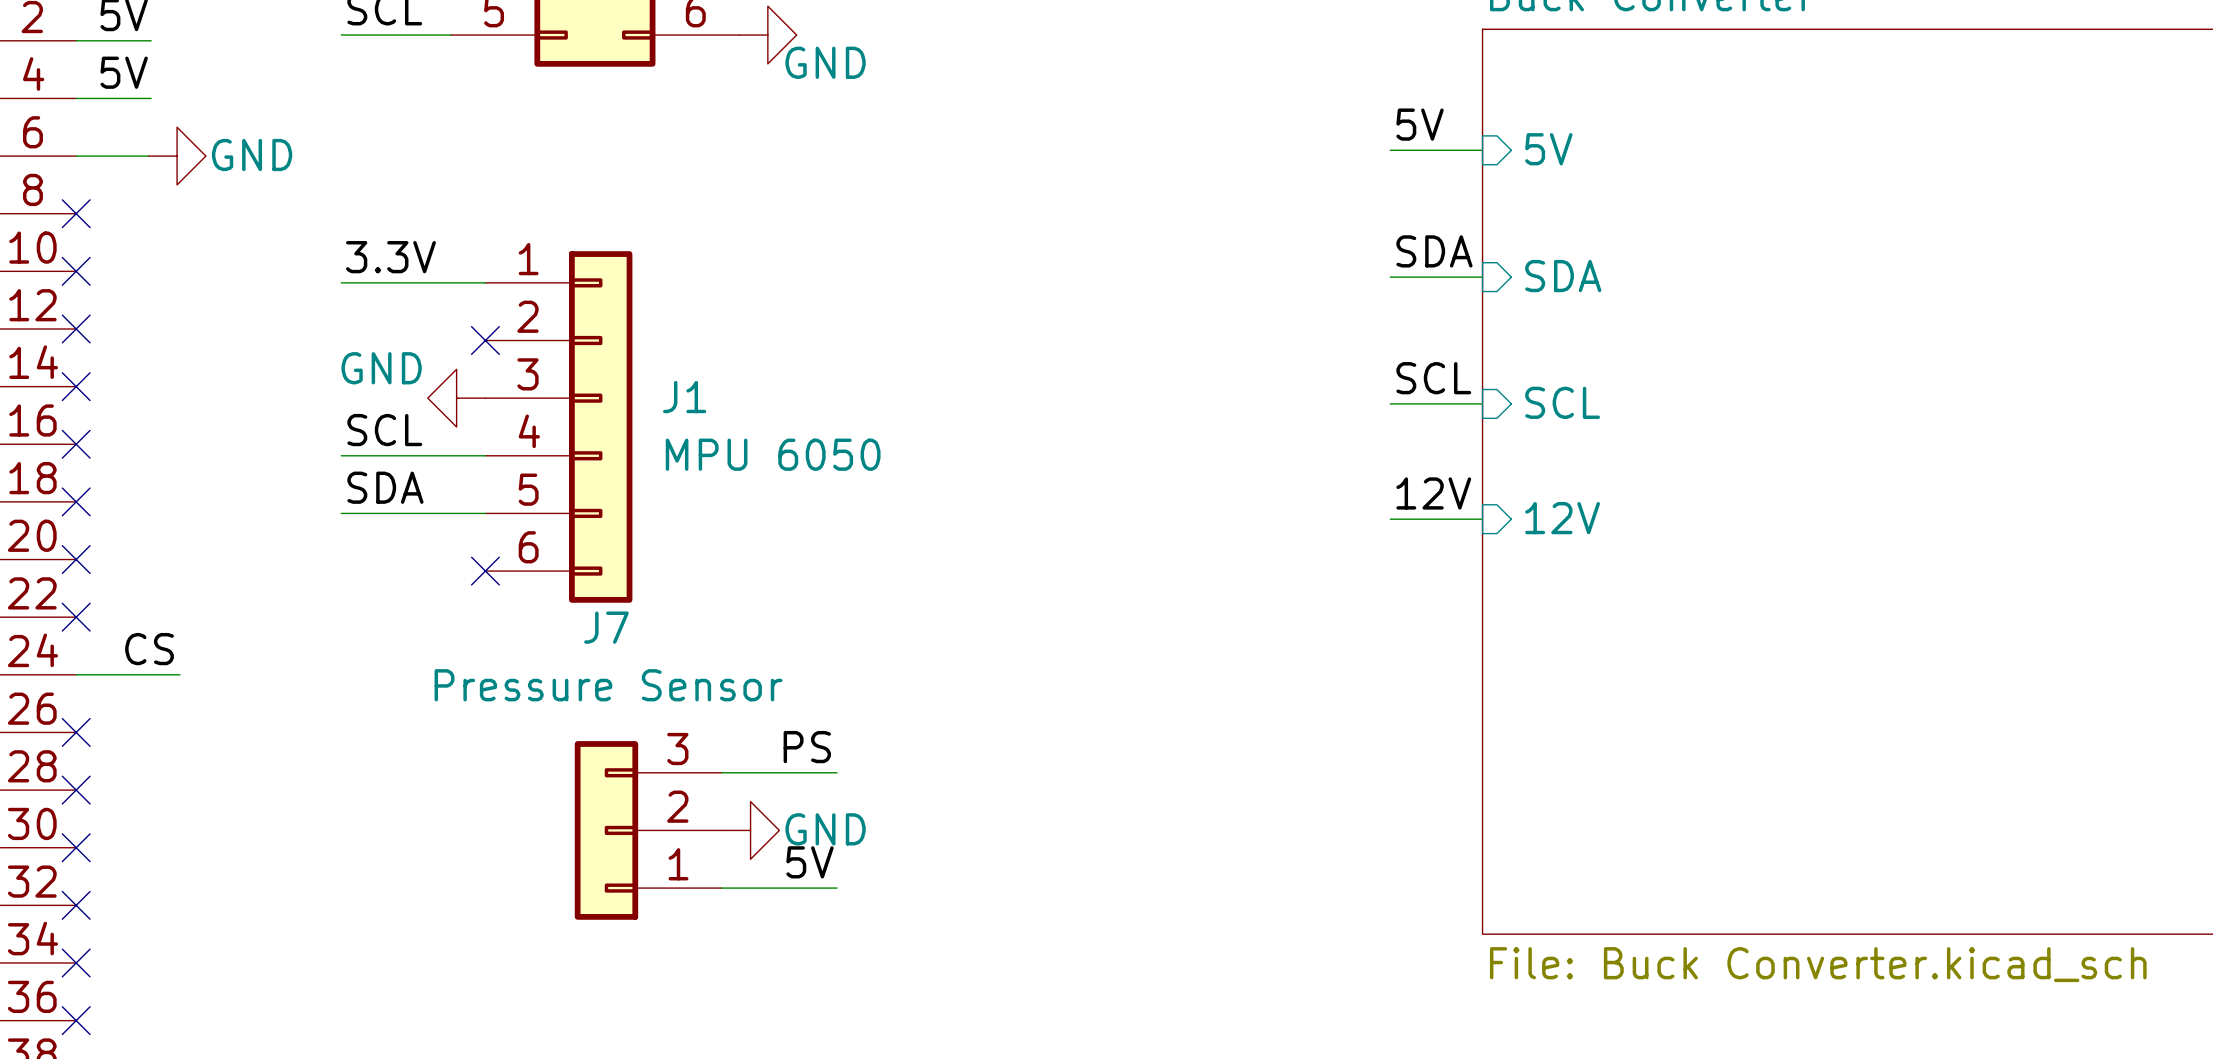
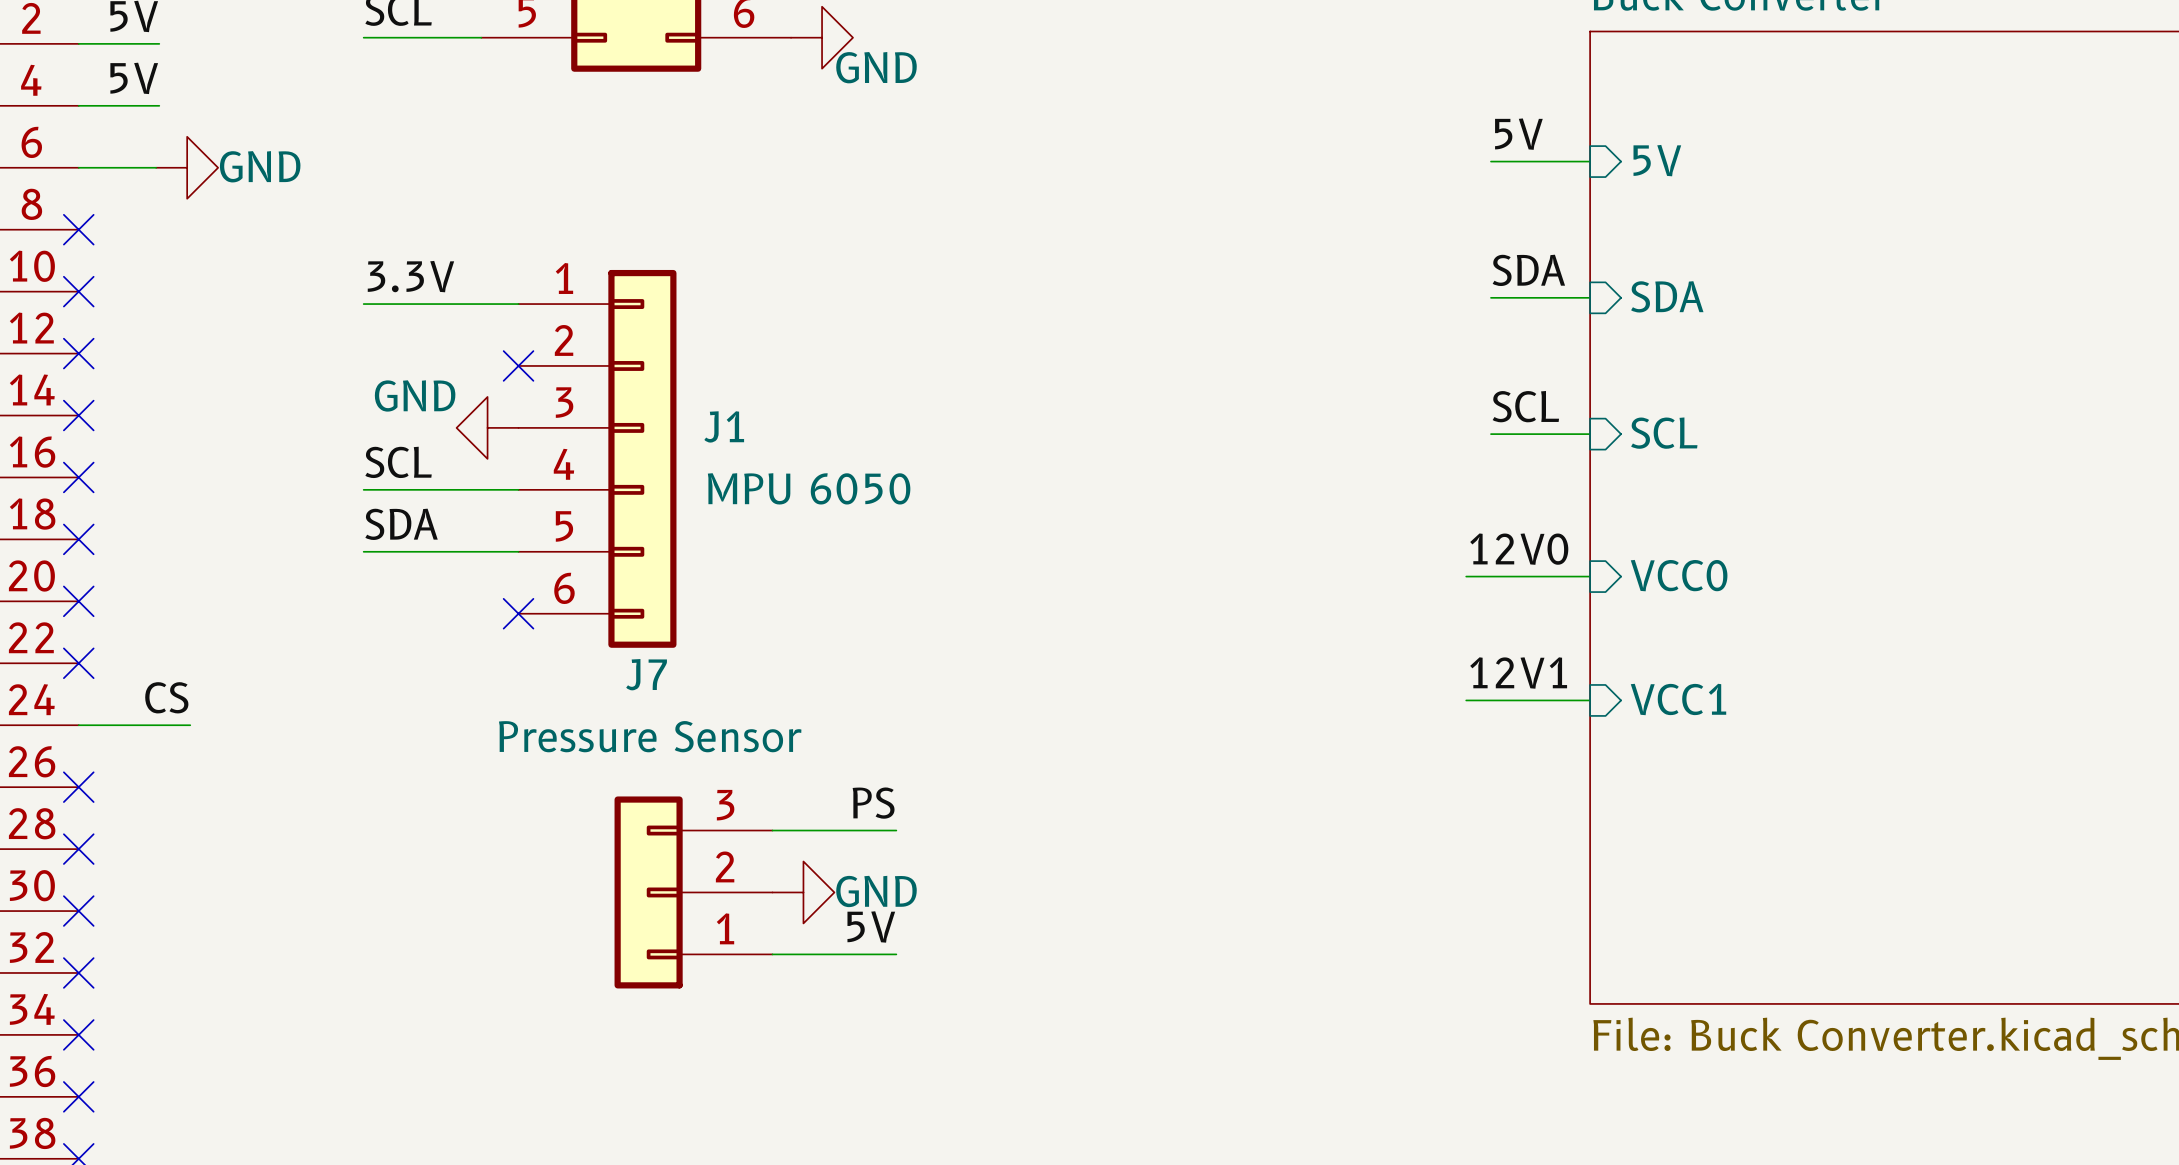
label: 12V (1433, 493) -> 12V0 (1519, 549)
sheet pin: 12V (1562, 518) -> VCC0 (1679, 575)
wire: (1390, 519) (1482, 519) -> none
wire: none -> (1466, 576) (1590, 576)
label: none -> 12V1 (1518, 673)
sheet pin: none -> VCC1 (1678, 699)
wire: none -> (1466, 700) (1590, 700)

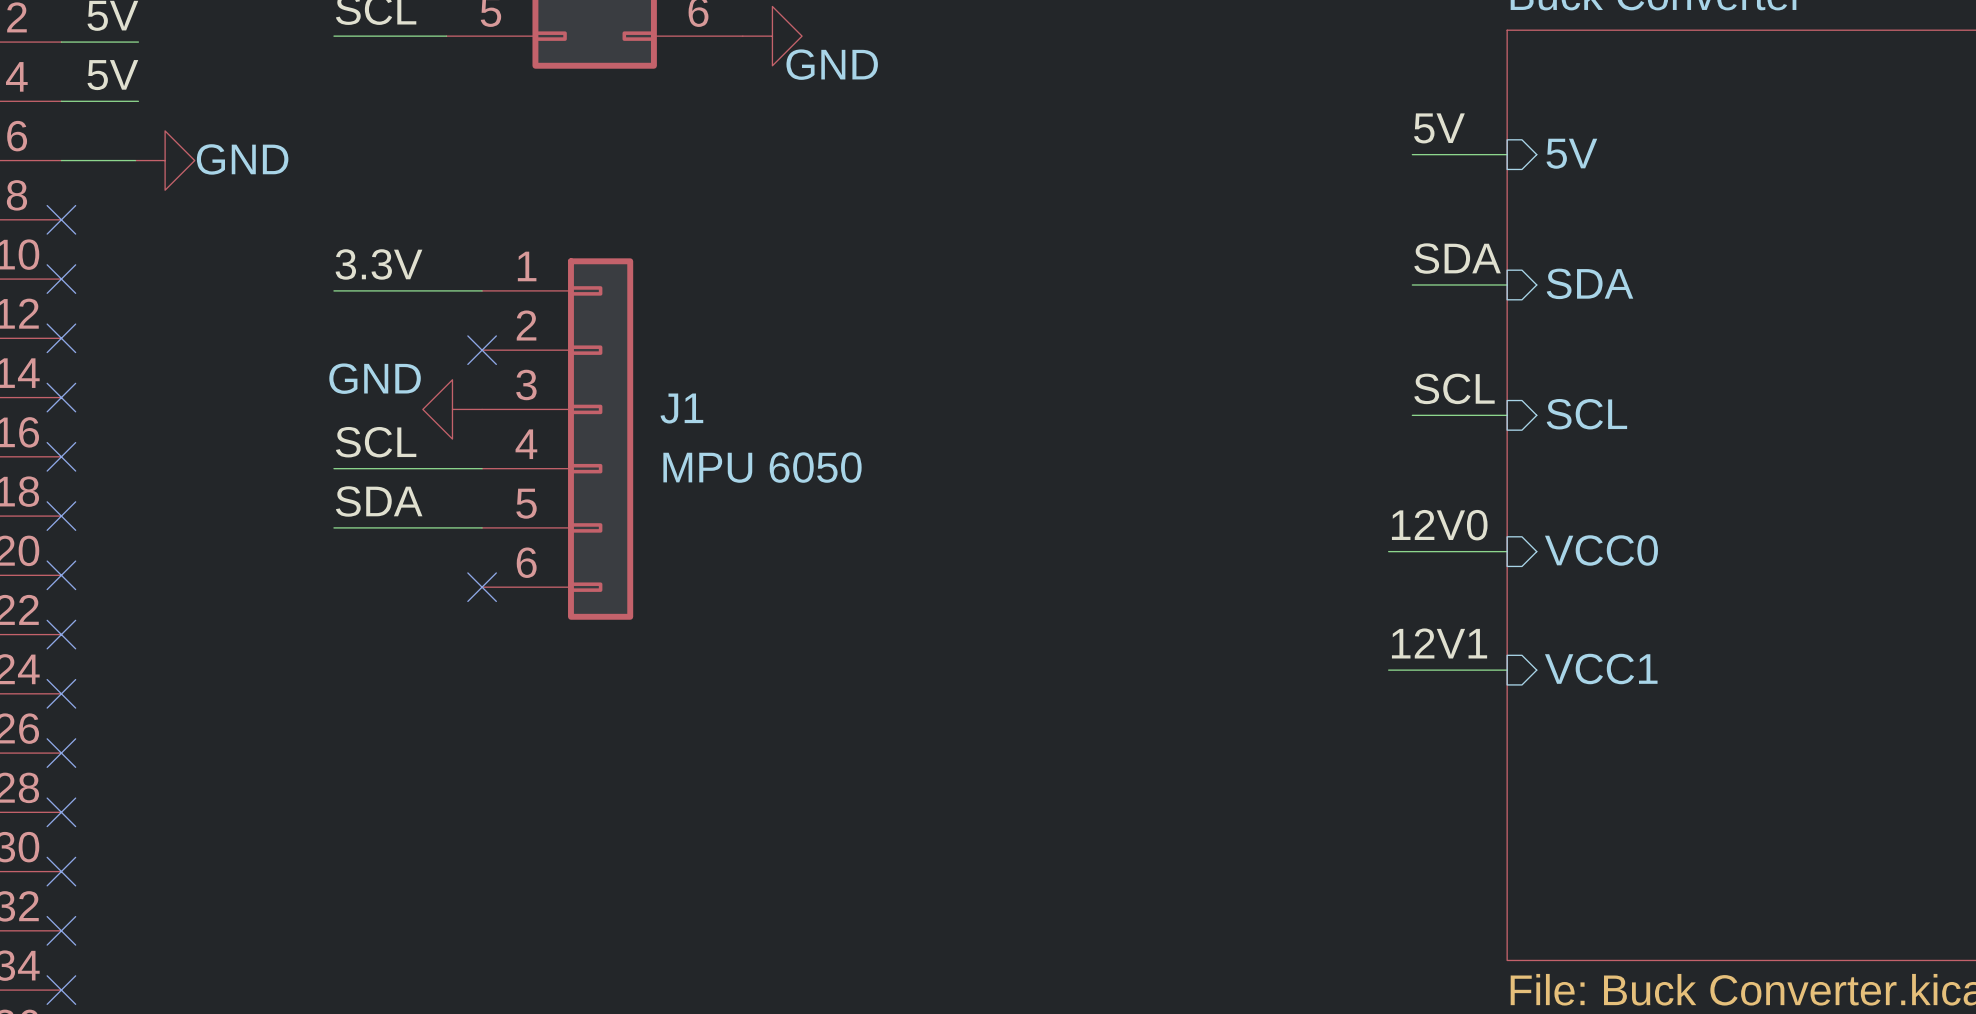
label: CS (166, 697) -> none
wire: (78, 725) (190, 725) -> none
no-connect mark: none -> (61, 693)
label: PS (873, 803) -> none
wire: (772, 830) (896, 830) -> none
J7: Pressure Sensor (693, 892) -> none
power symbol: GND (803, 892) -> none
label: 5V (871, 926) -> none
wire: (772, 954) (896, 954) -> none

